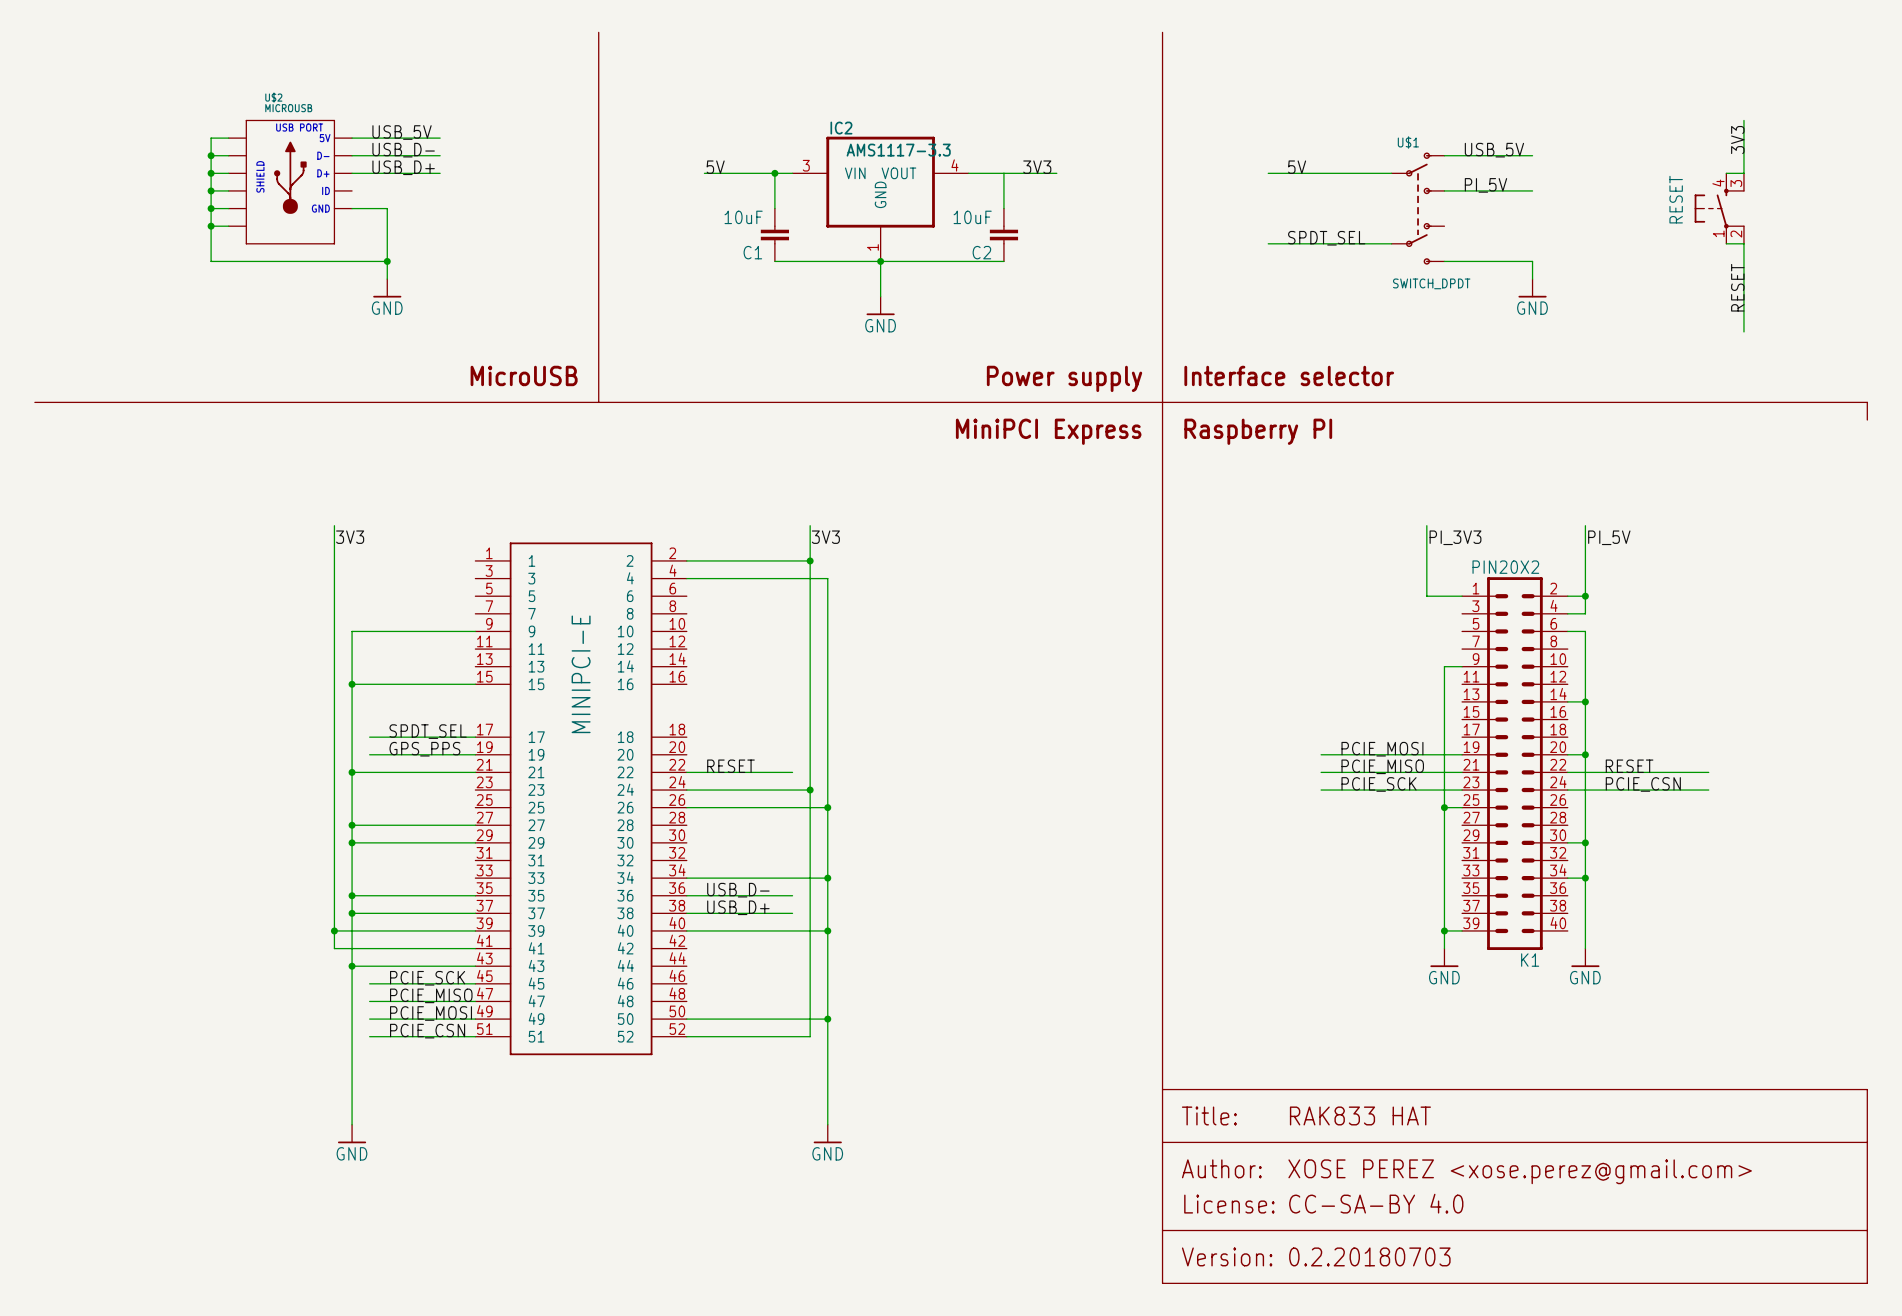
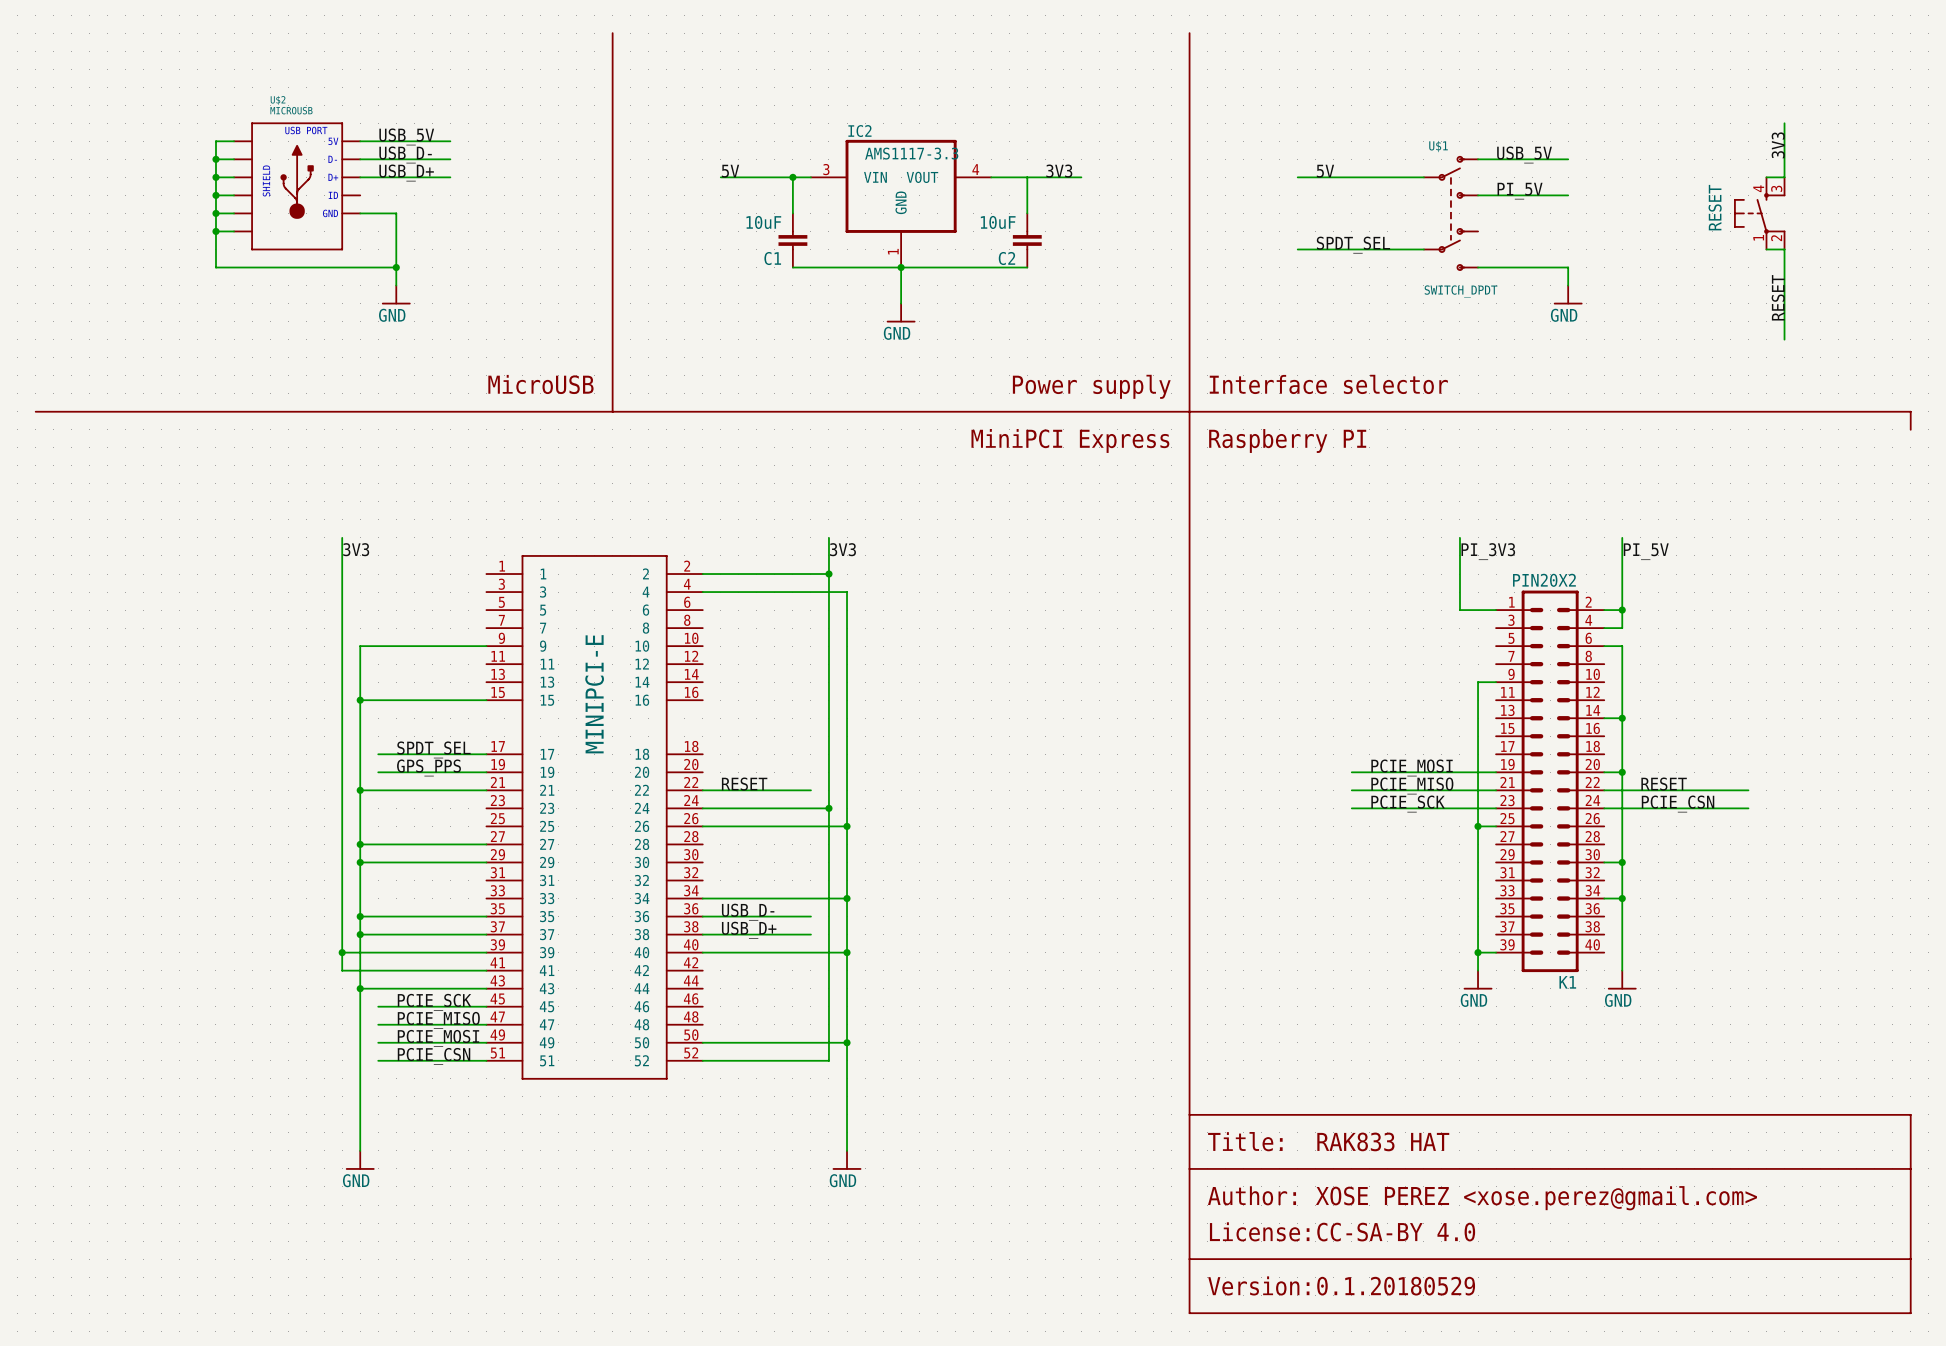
part text: 0.2.20180703 (1369, 1256) -> 0.1.20180529 (1396, 1286)

